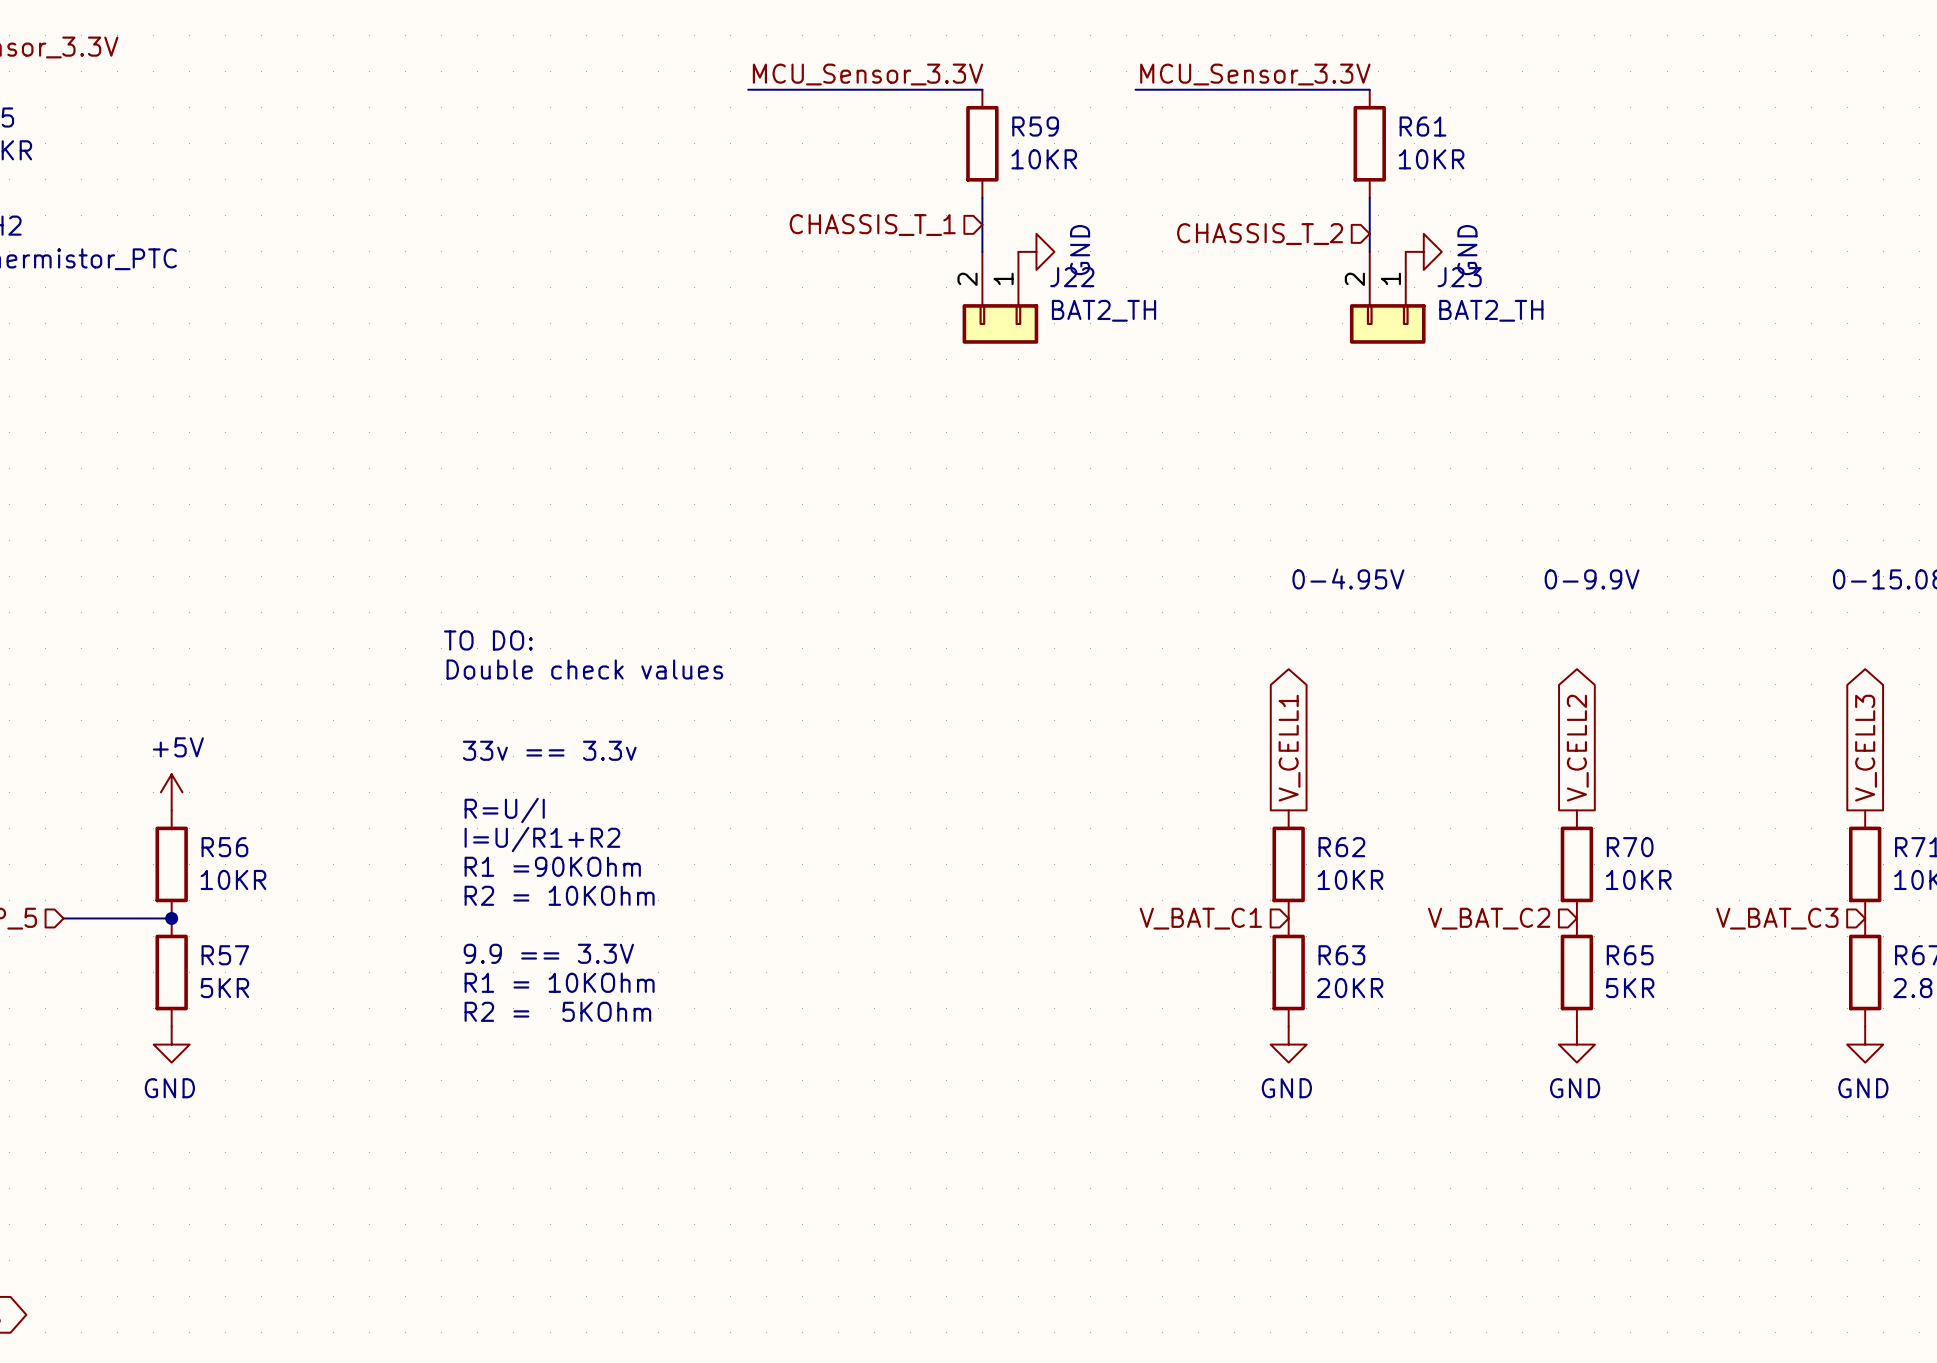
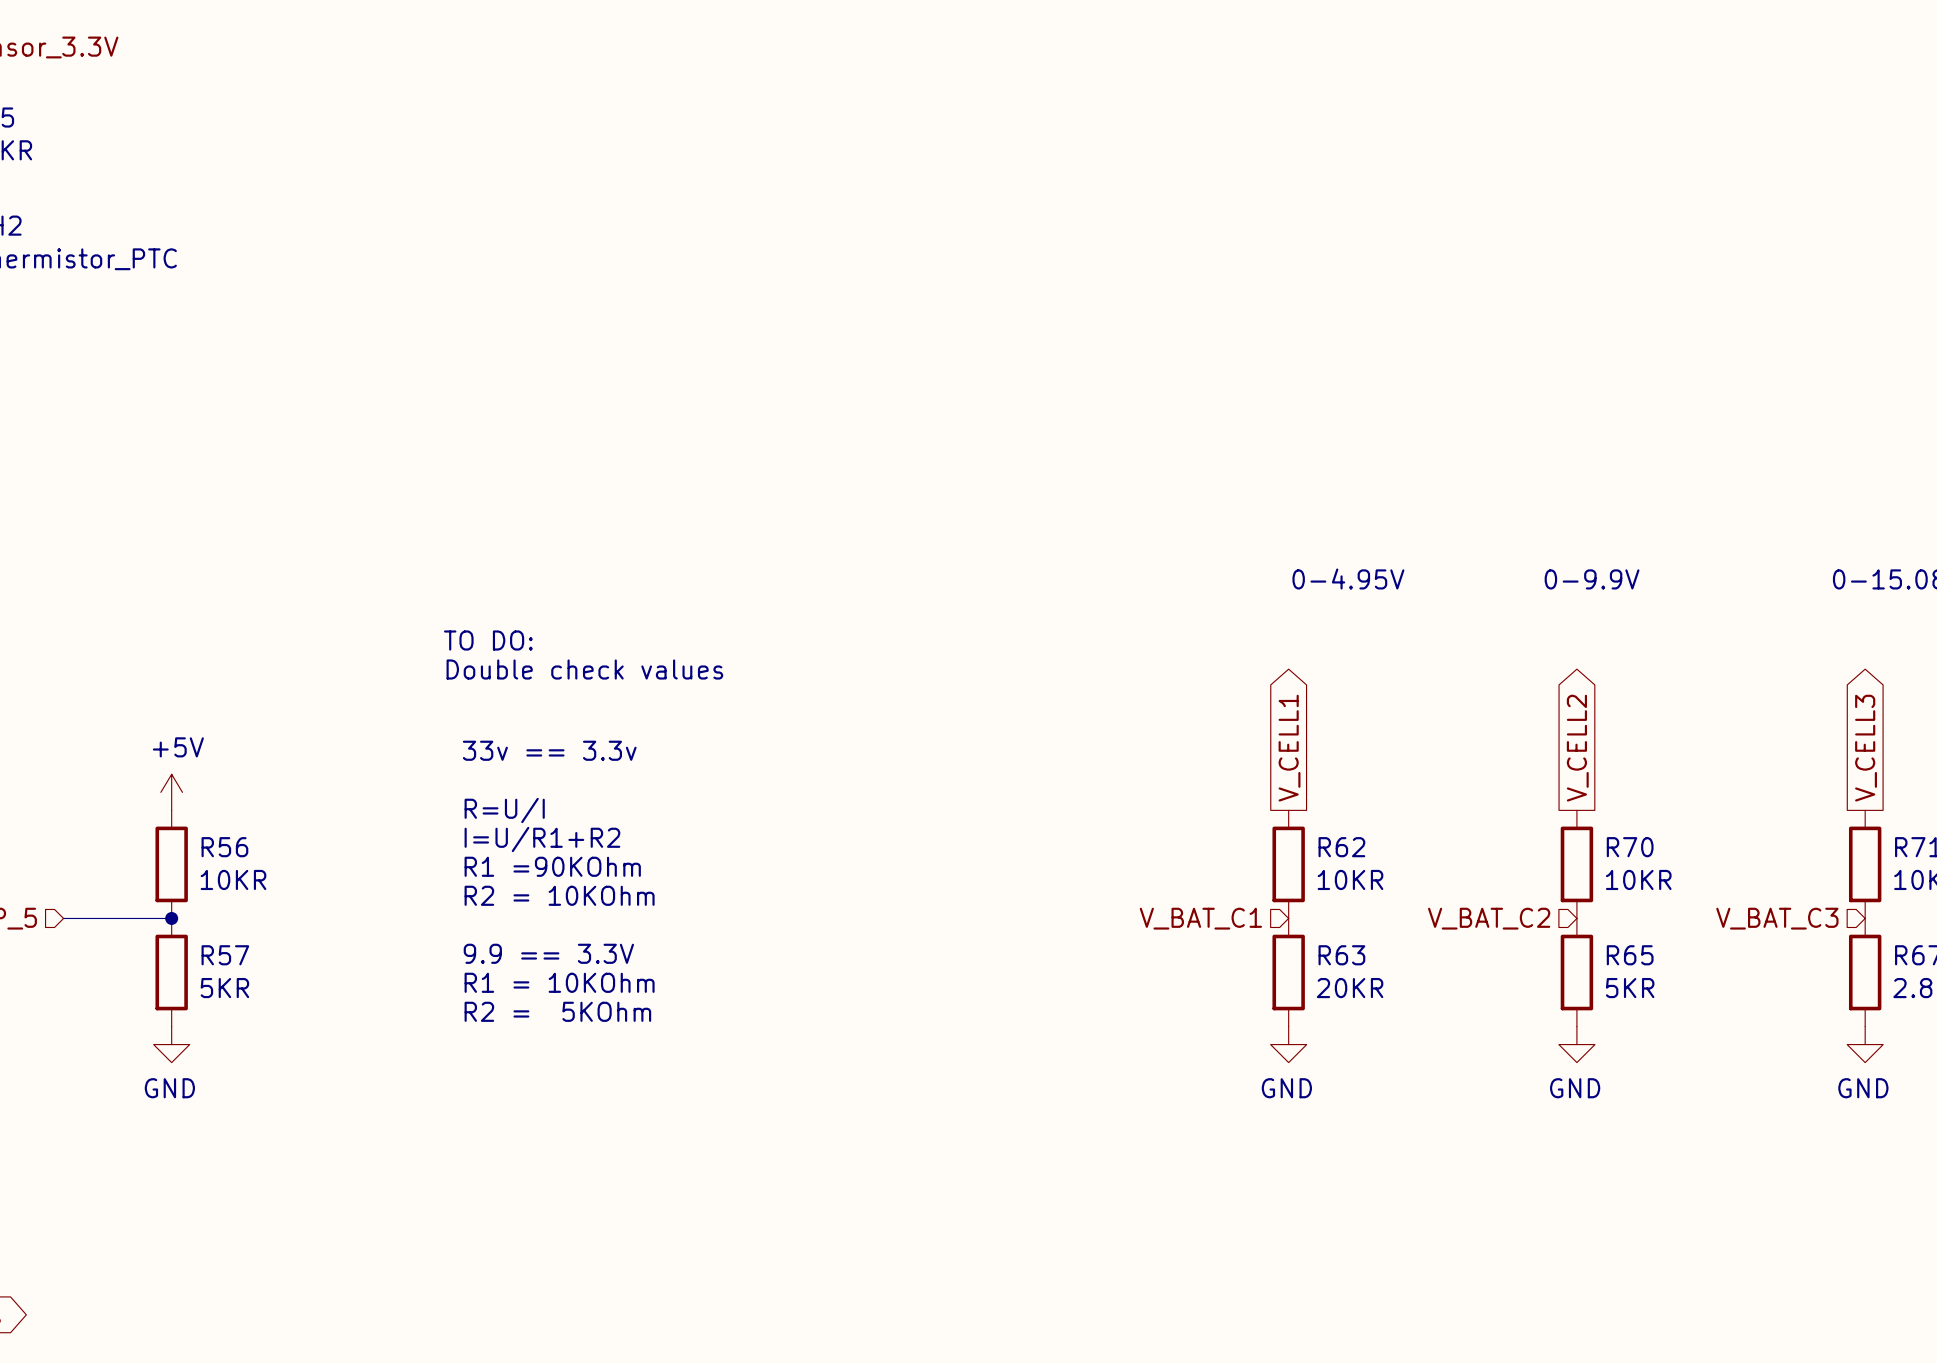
label: MCU_Sensor_3.3V (868, 74) -> none
label: MCU_Sensor_3.3V (1255, 74) -> none
wire: (748, 89) (982, 89) -> none
wire: (1135, 89) (1369, 89) -> none
R59: 10KR (982, 143) -> none
R61: 10KR (1369, 143) -> none
wire: (982, 197) (982, 251) -> none
wire: (1369, 197) (1369, 251) -> none
hierarchical label: CHASSIS_T_1 (872, 225) -> none
hierarchical label: CHASSIS_T_2 (1260, 234) -> none
power symbol: GND (1036, 251) -> none
power symbol: GND (1423, 251) -> none
J22: BAT2_TH (1000, 297) -> none
J23: BAT2_TH (1387, 297) -> none

